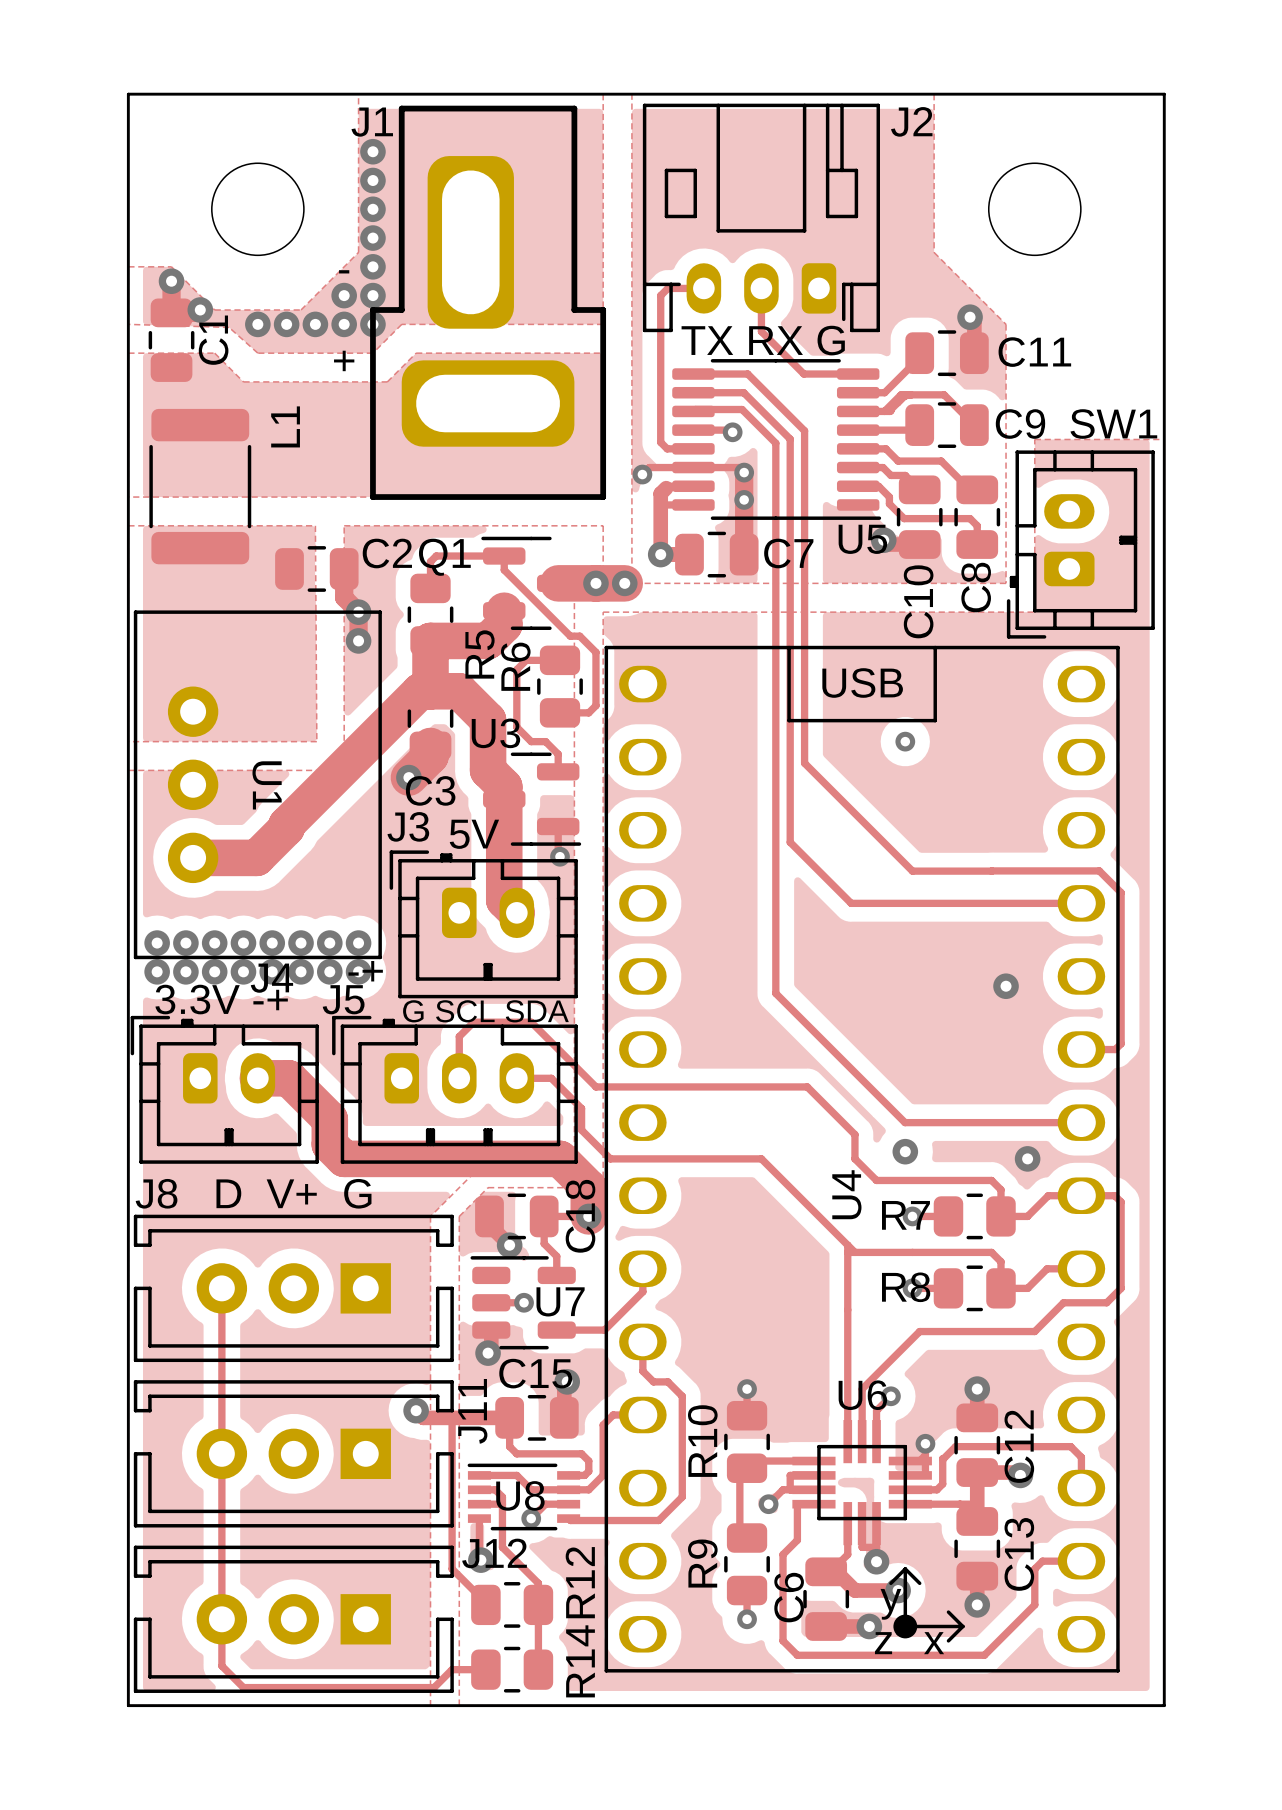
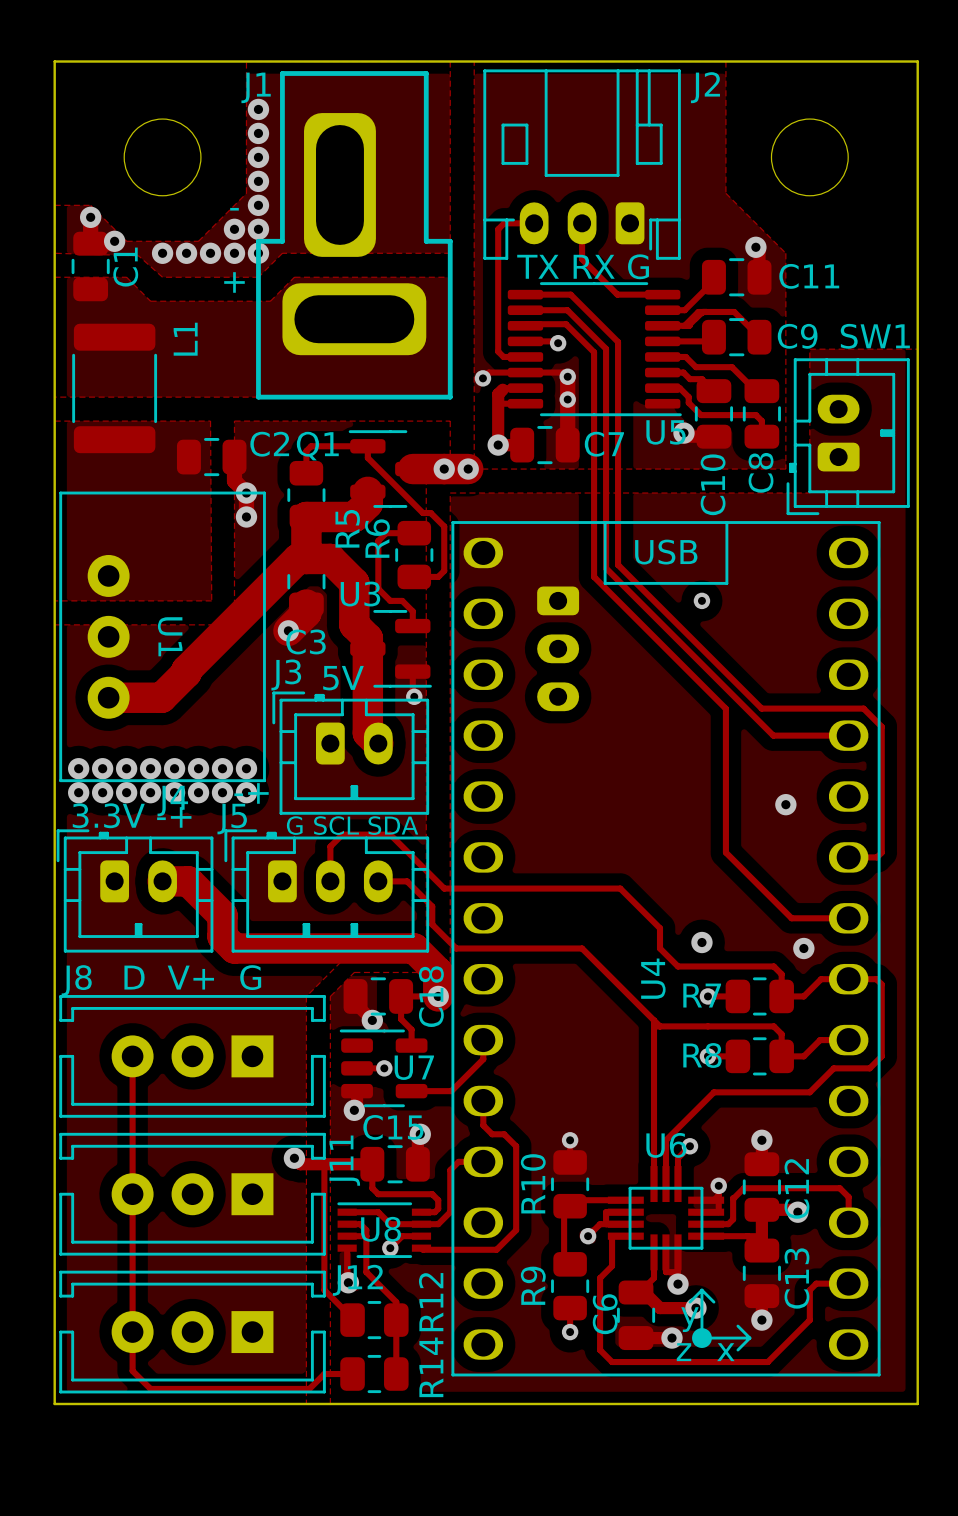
track: (804, 698) (804, 763) (912, 871) (991, 871) -> (618, 564) (761, 708) (774, 708)
track: (790, 702) (790, 842) (851, 903) (991, 903) -> (606, 568) (773, 735)
track: (775, 712) (775, 993) (905, 1122) (1012, 1122) -> (594, 576) (725, 708) (725, 852) (791, 918)
part: none -> (558, 648)

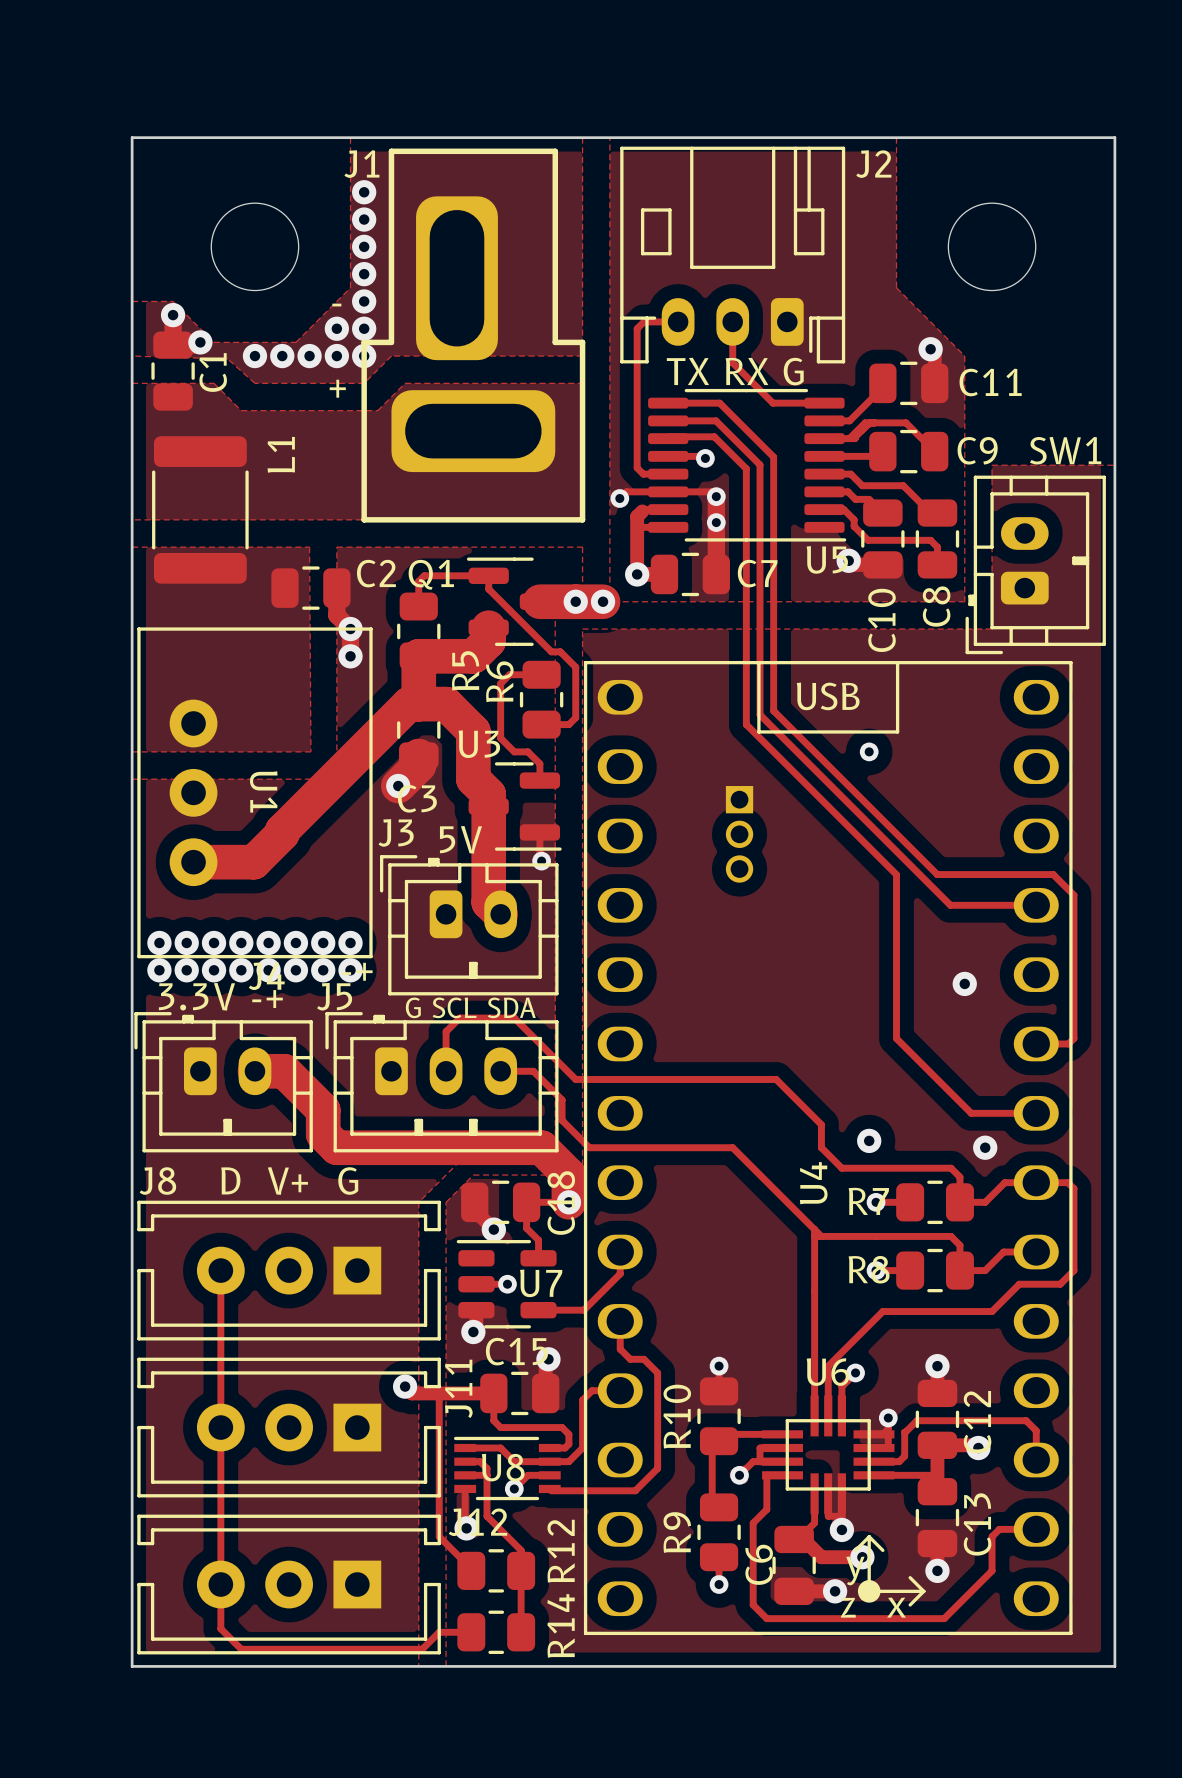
part: (558, 648) -> none
part: none -> (739, 834)

